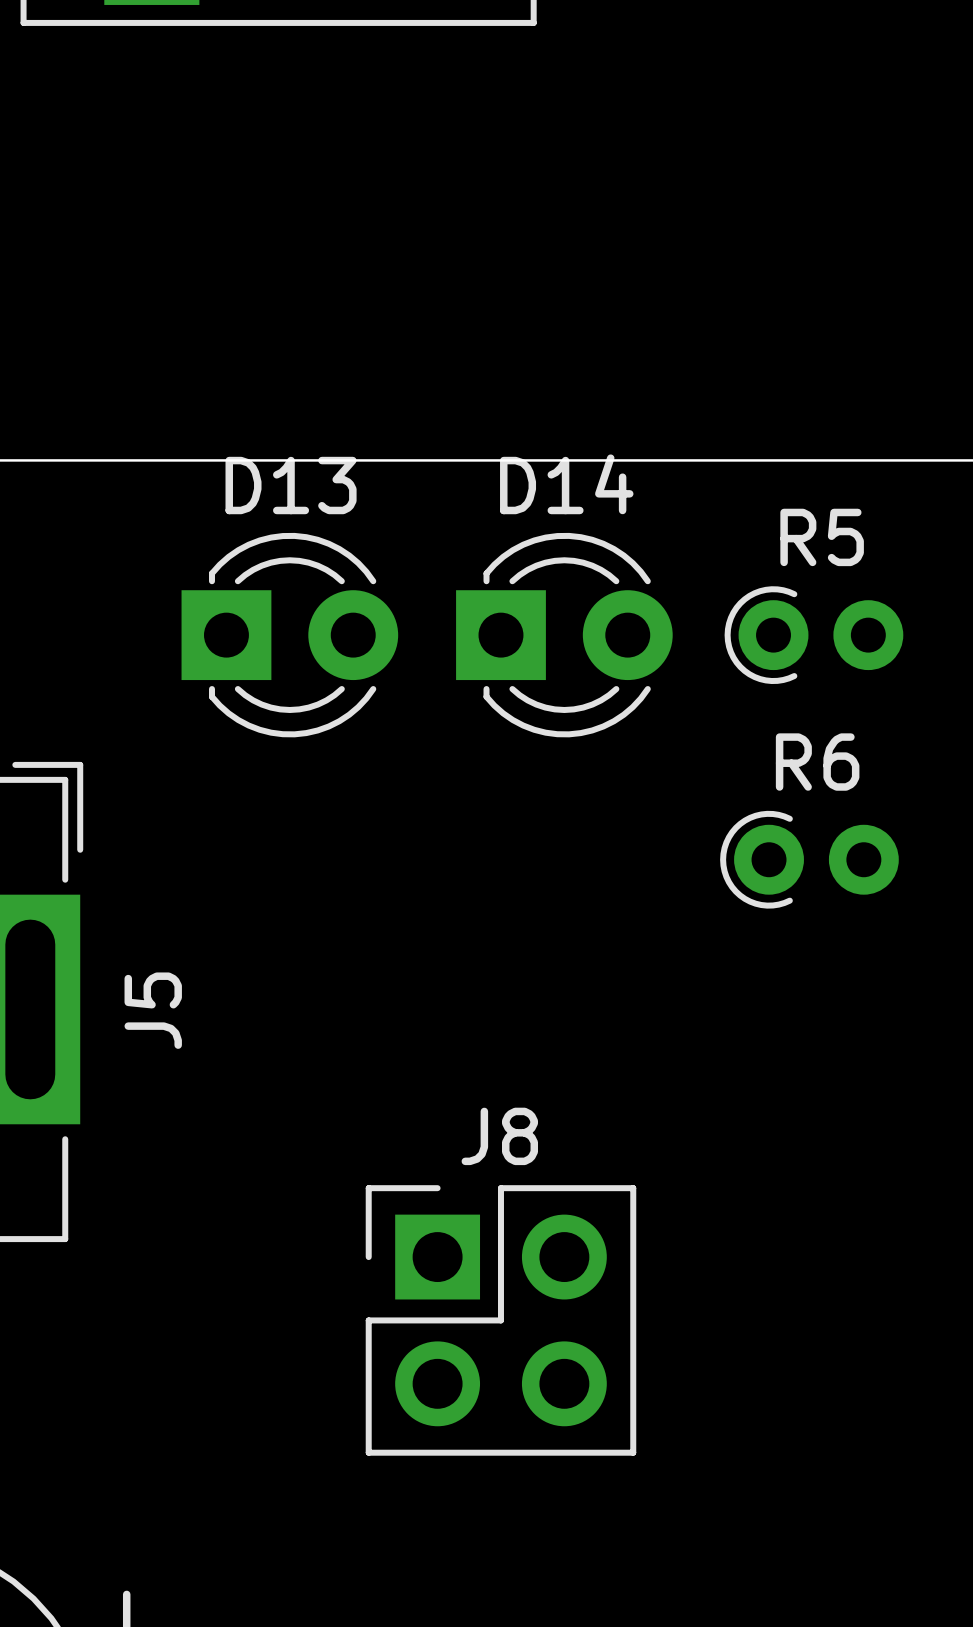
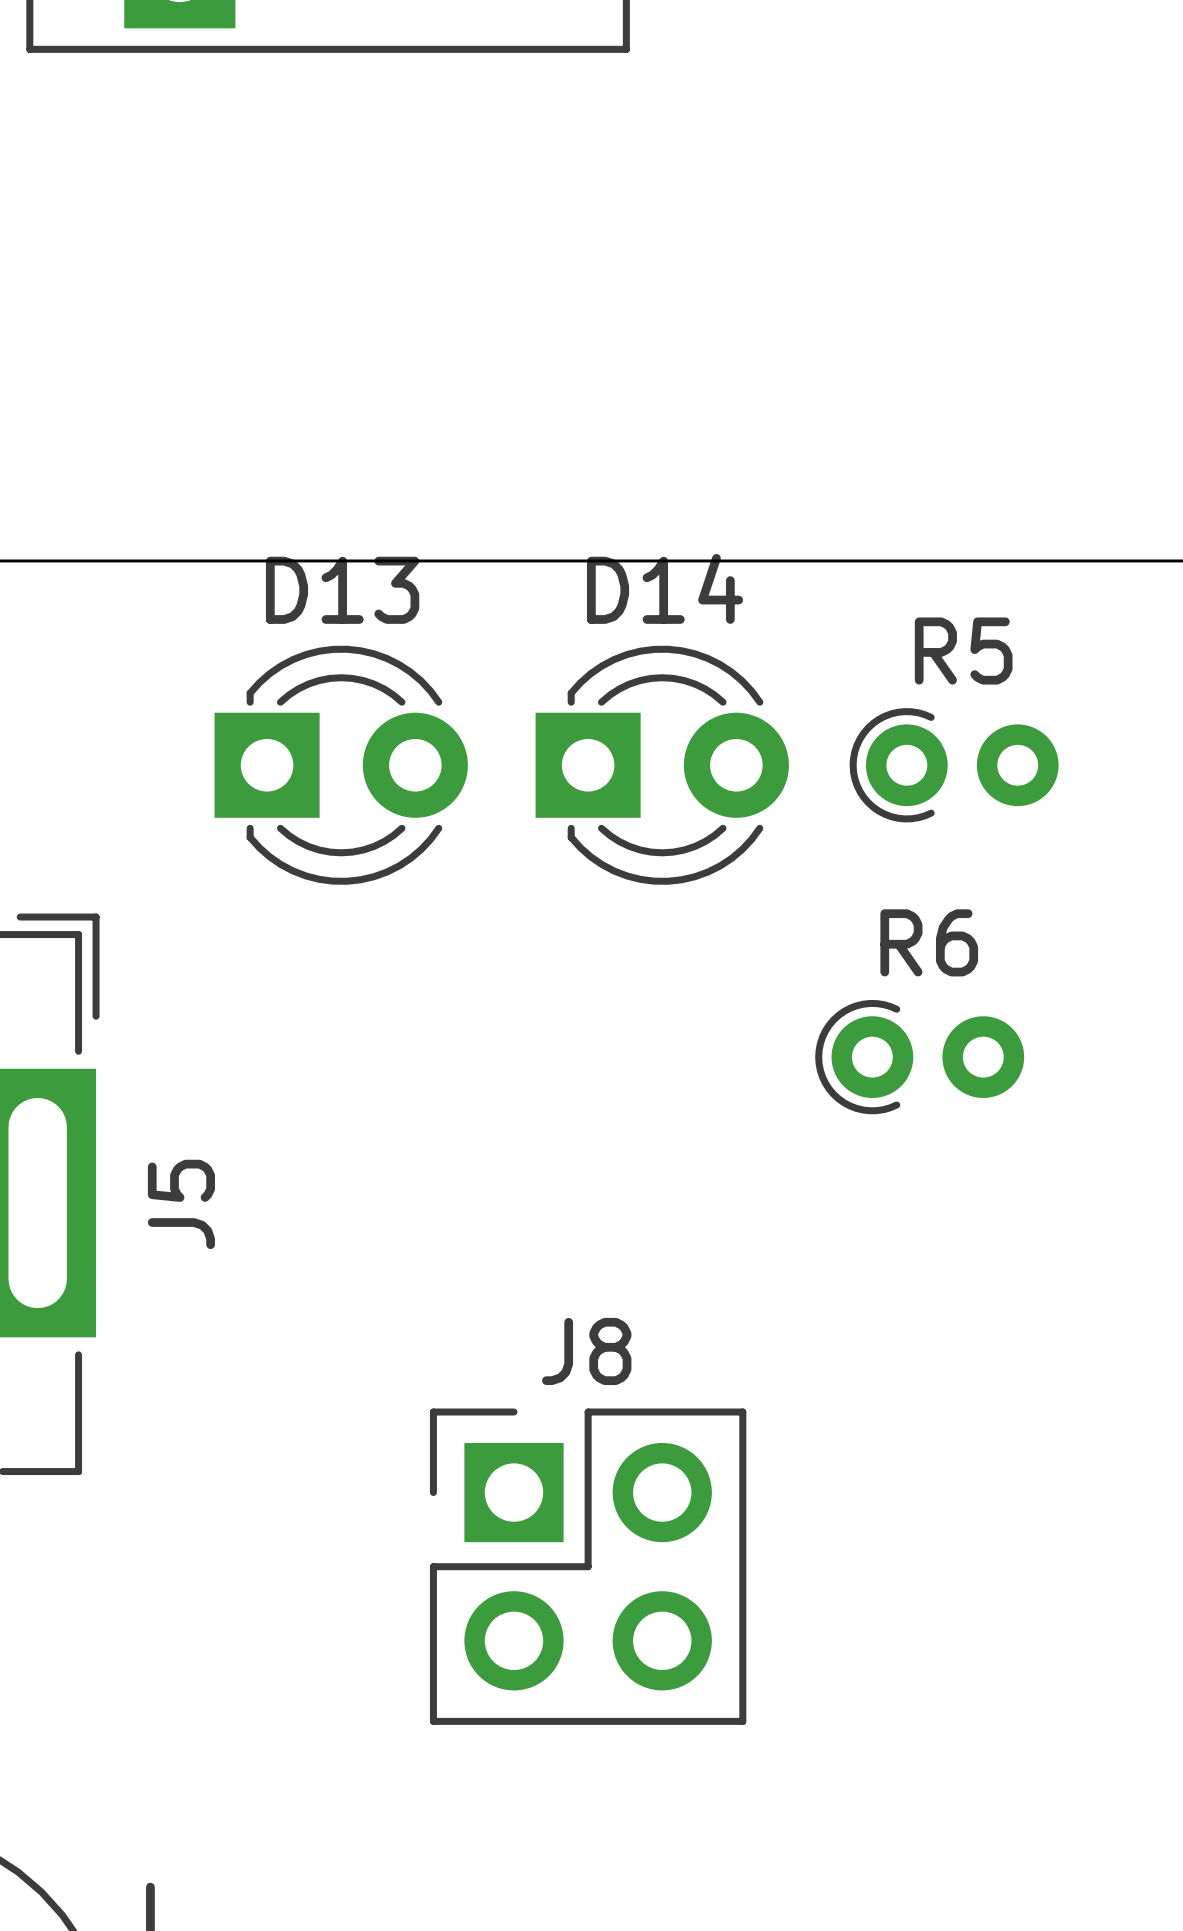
R6 position: (809, 859) -> (919, 1057)

